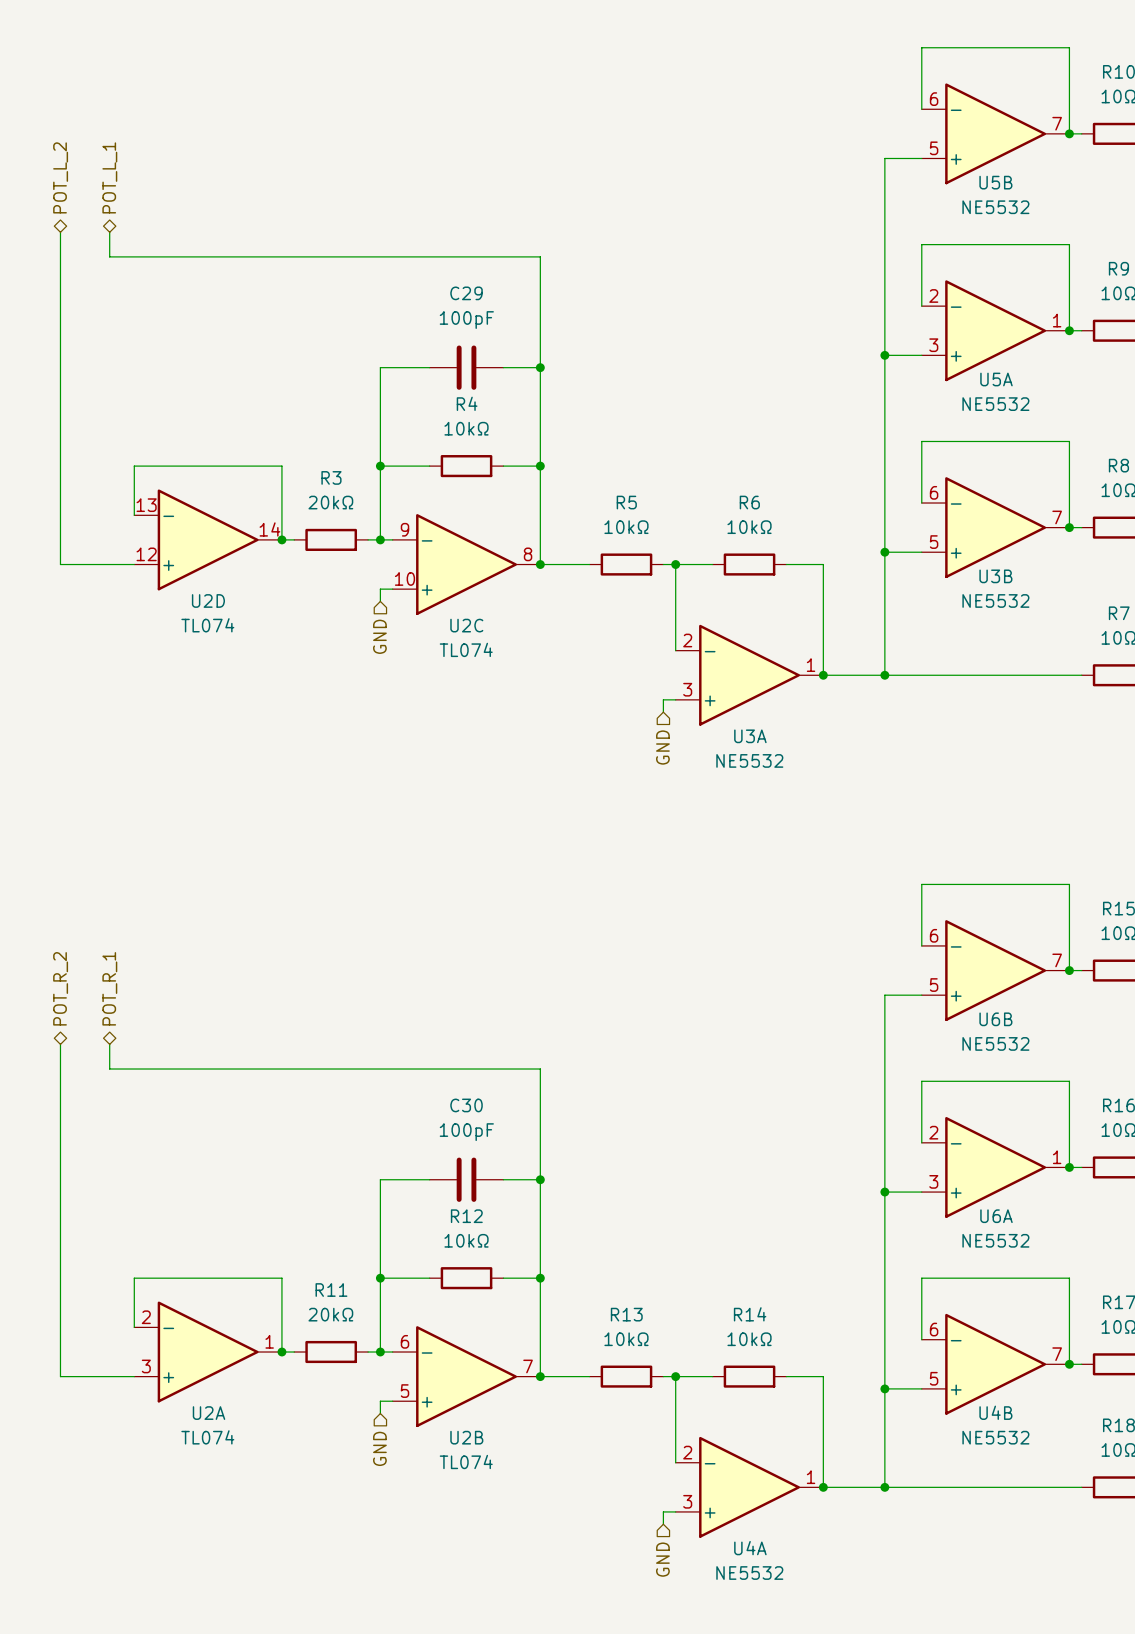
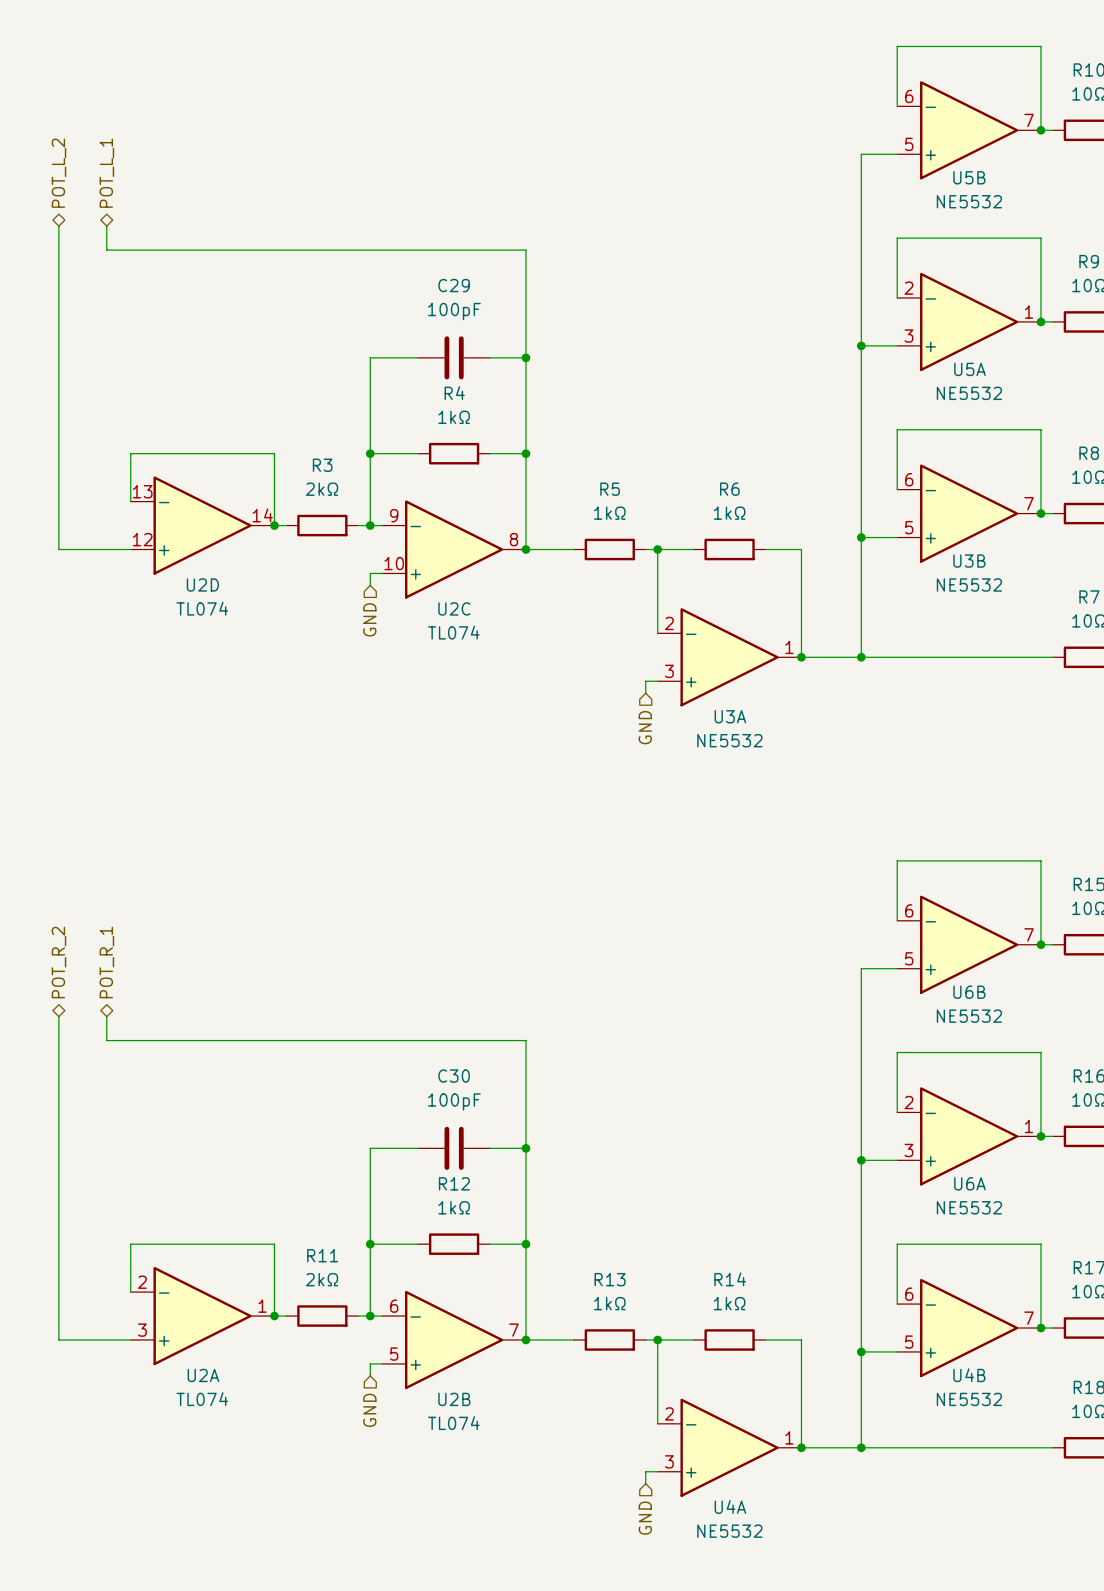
R4 value: 10kΩ (466, 428) -> 1kΩ (454, 417)
R3 value: 20kΩ (330, 502) -> 2kΩ (322, 489)
R5 value: 10kΩ (626, 527) -> 1kΩ (609, 513)
R6 value: 10kΩ (749, 527) -> 1kΩ (729, 513)
R12 value: 10kΩ (466, 1240) -> 1kΩ (454, 1207)
R11 value: 20kΩ (330, 1314) -> 2kΩ (322, 1279)
R13 value: 10kΩ (626, 1339) -> 1kΩ (609, 1303)
R14 value: 10kΩ (749, 1339) -> 1kΩ (729, 1303)

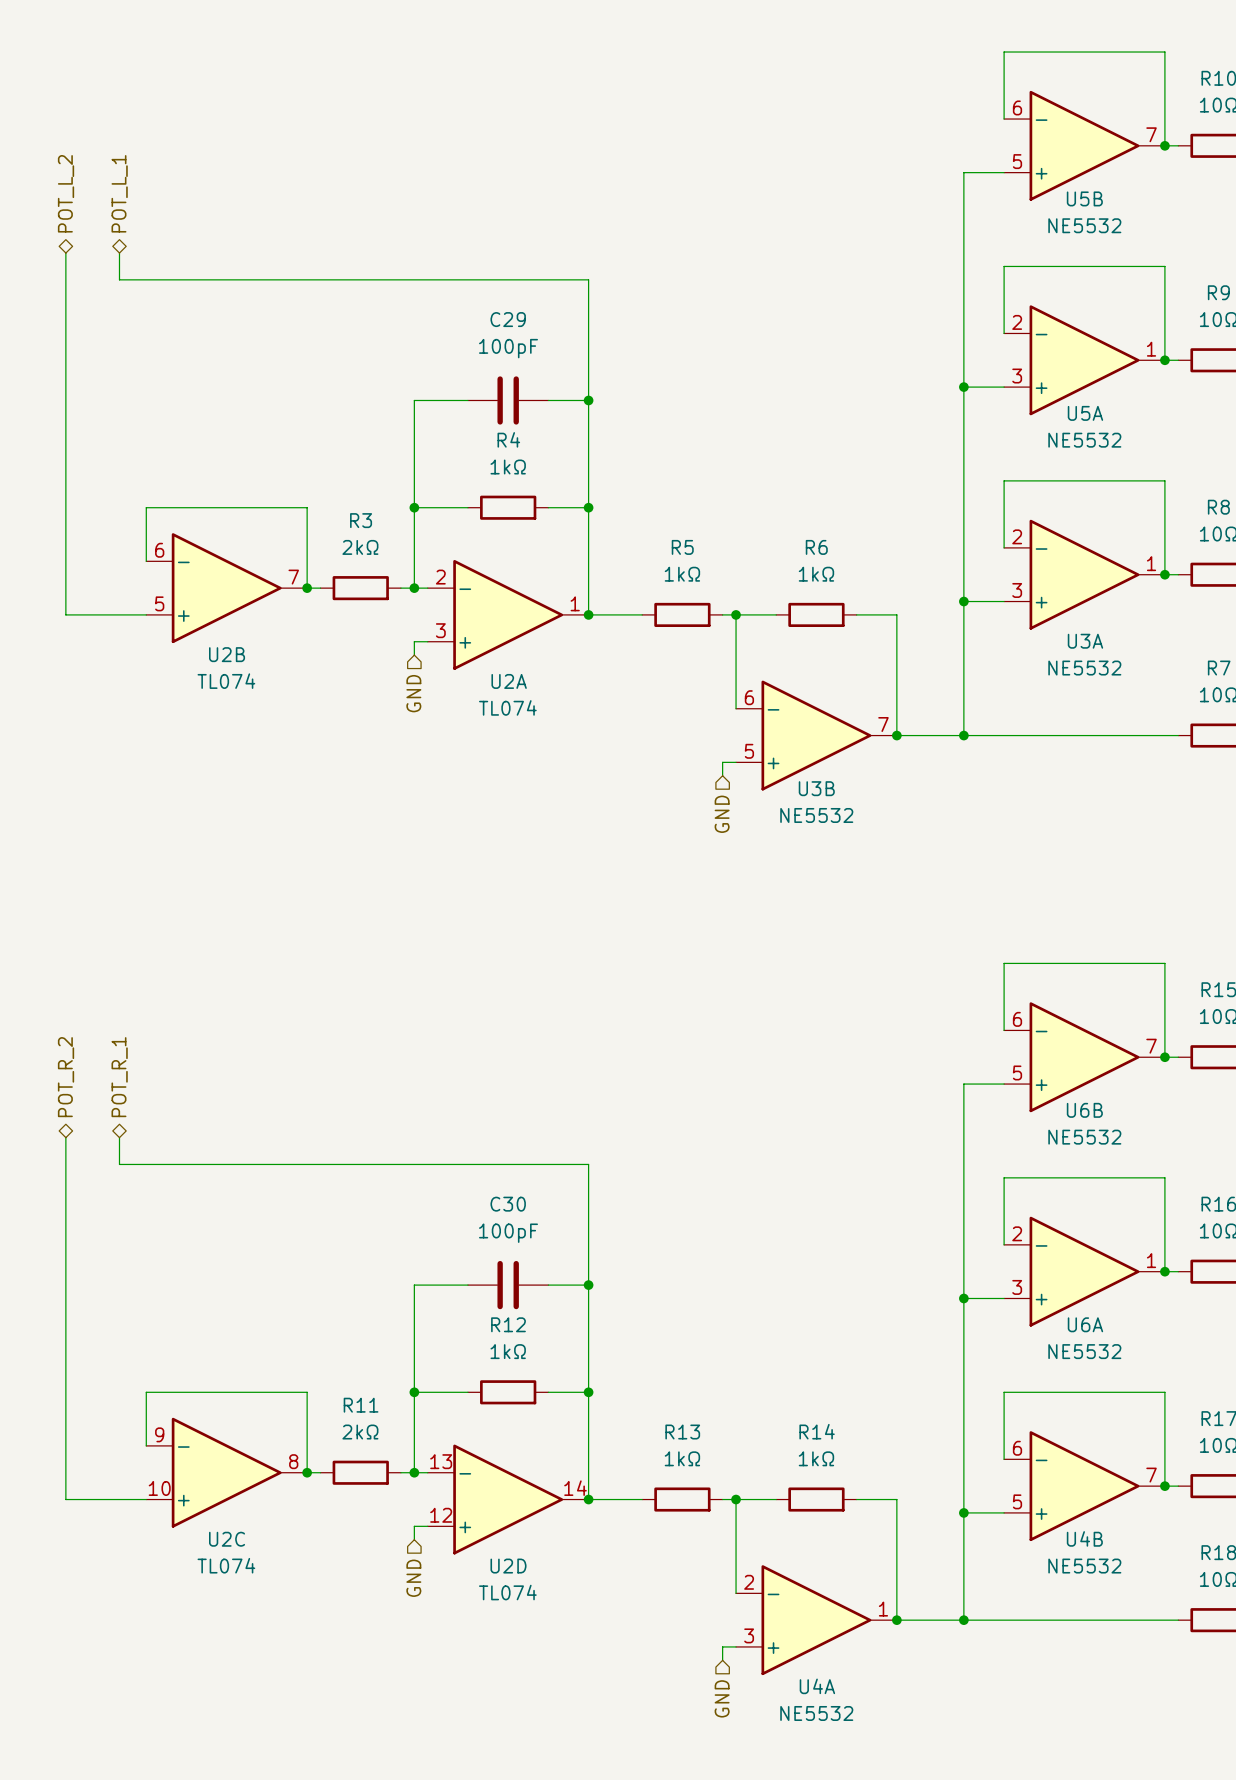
U3B position: (969, 513) -> (816, 735)
U2D position: (202, 525) -> (508, 1499)
U2C position: (454, 549) -> (226, 1472)
U3A position: (729, 657) -> (1084, 574)
U2A position: (202, 1316) -> (508, 614)
U2B position: (454, 1339) -> (226, 588)

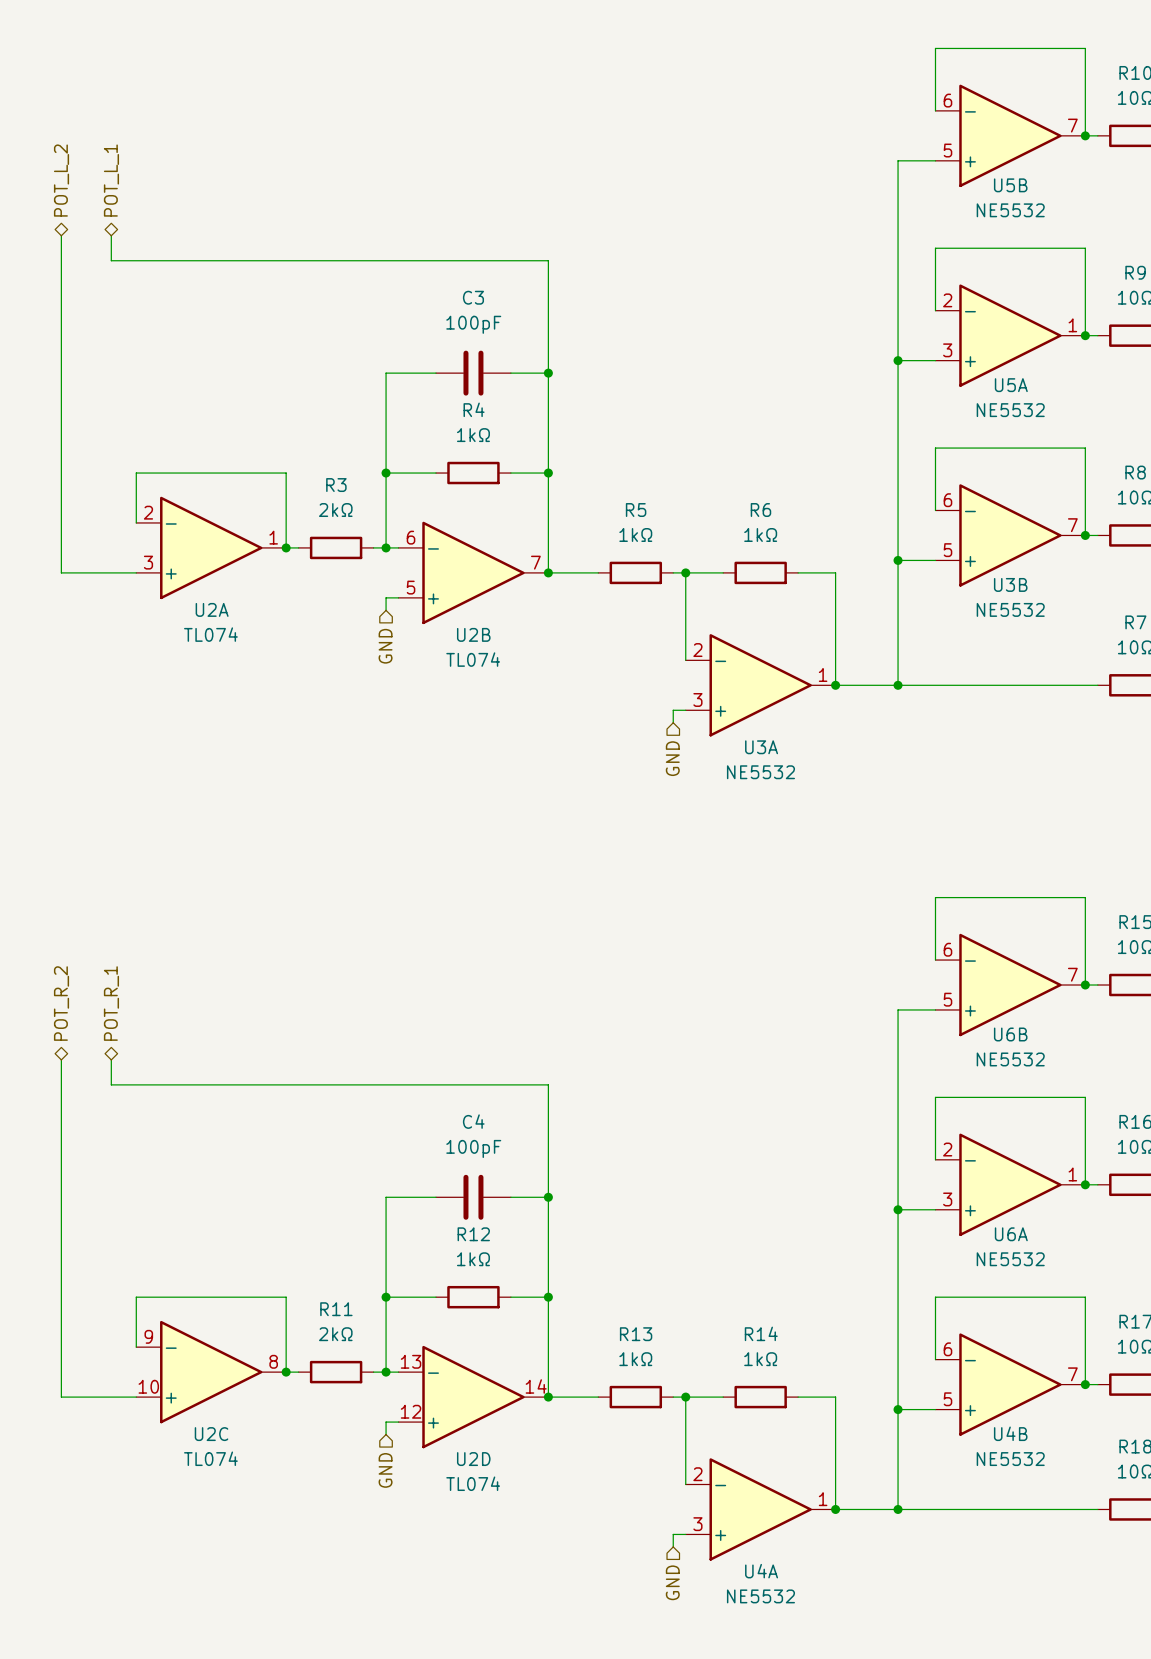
C29 name: C29 (508, 319) -> C3 (473, 297)
U3A position: (1084, 574) -> (760, 685)
U2B position: (226, 588) -> (473, 572)
U2A position: (508, 614) -> (211, 547)
U3B position: (816, 735) -> (1010, 535)
C30 name: C30 (508, 1204) -> C4 (473, 1121)

